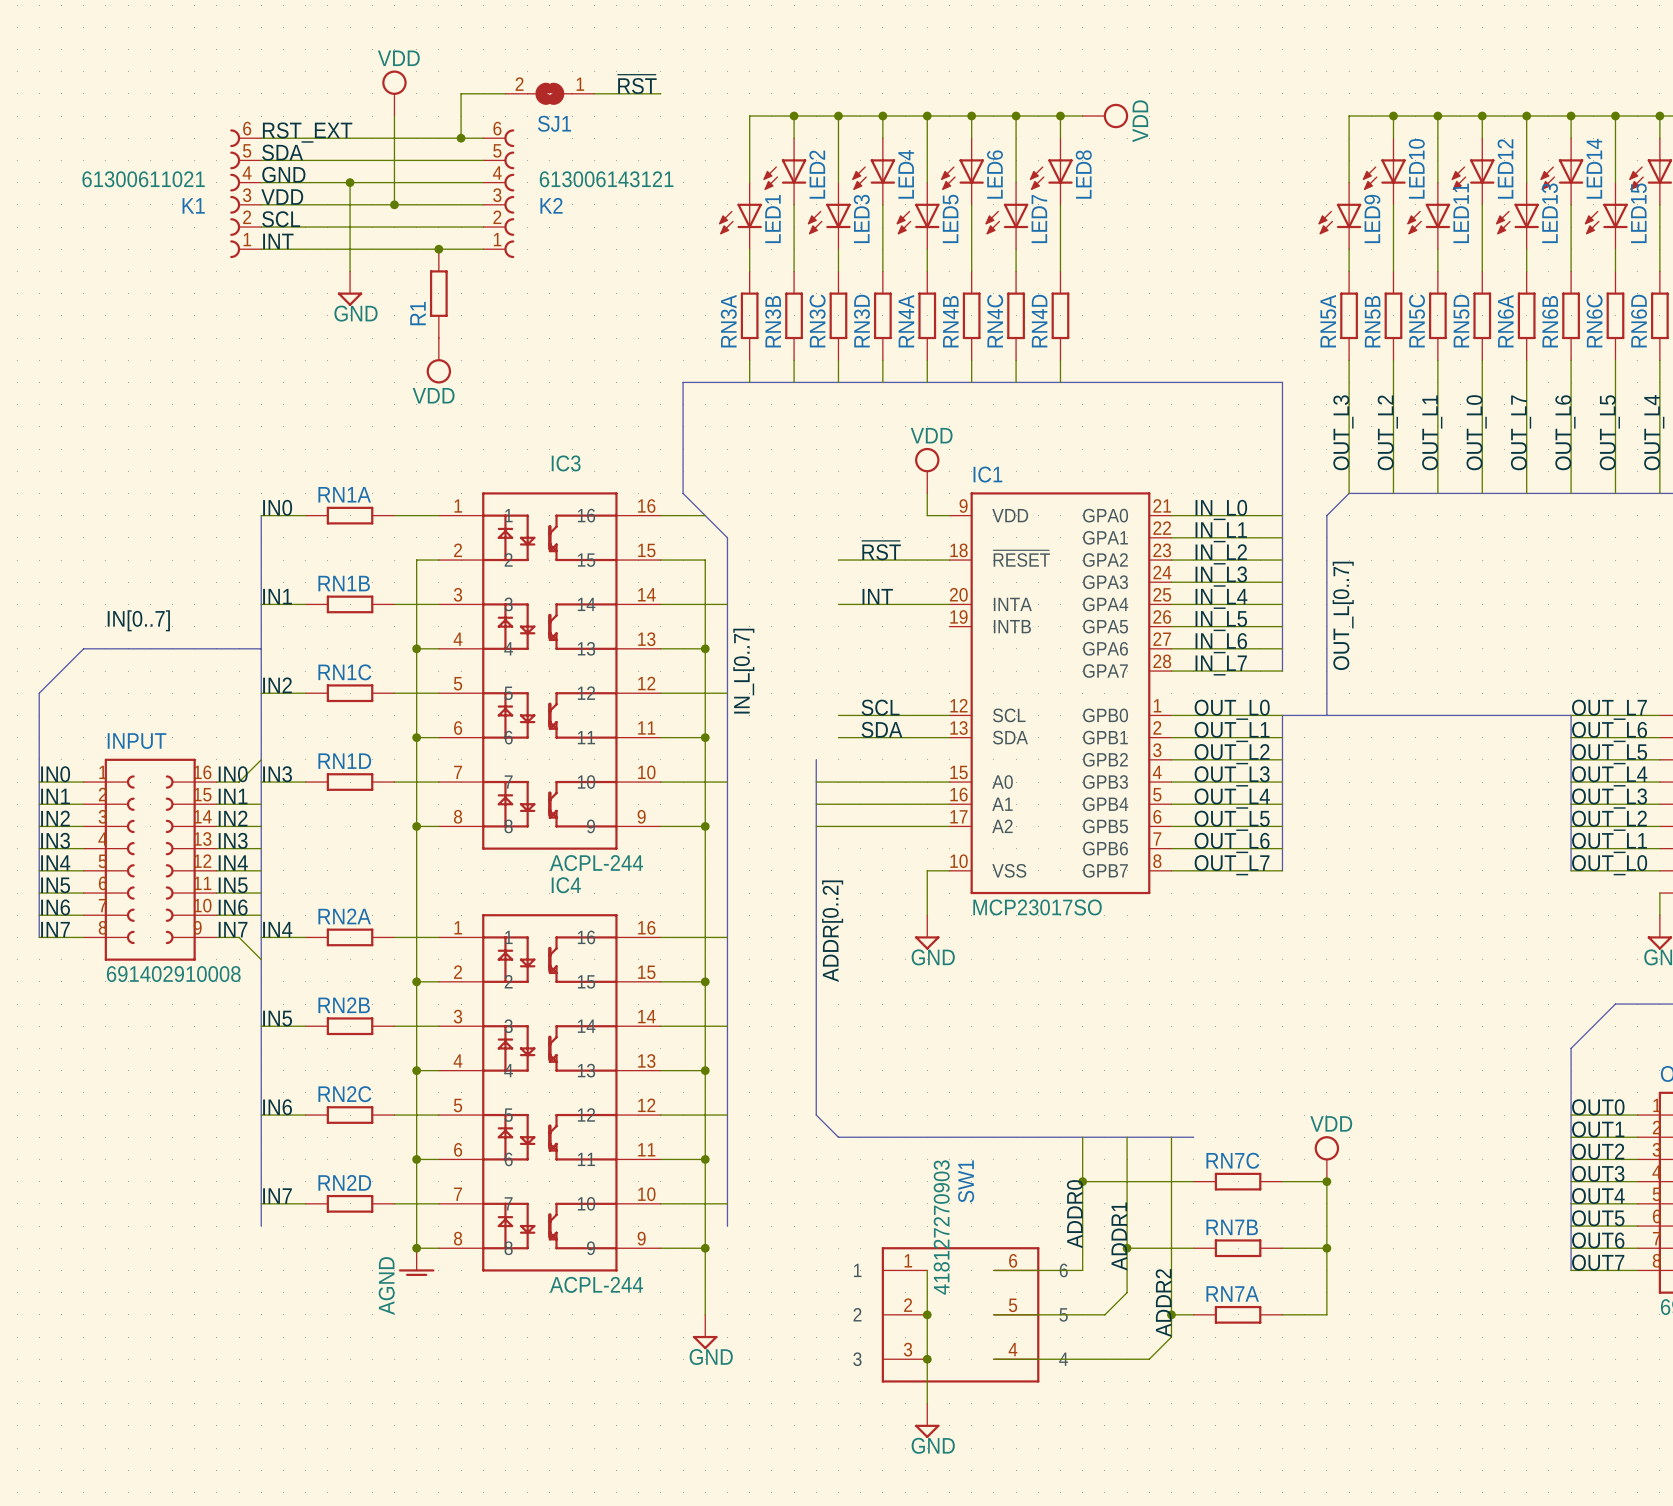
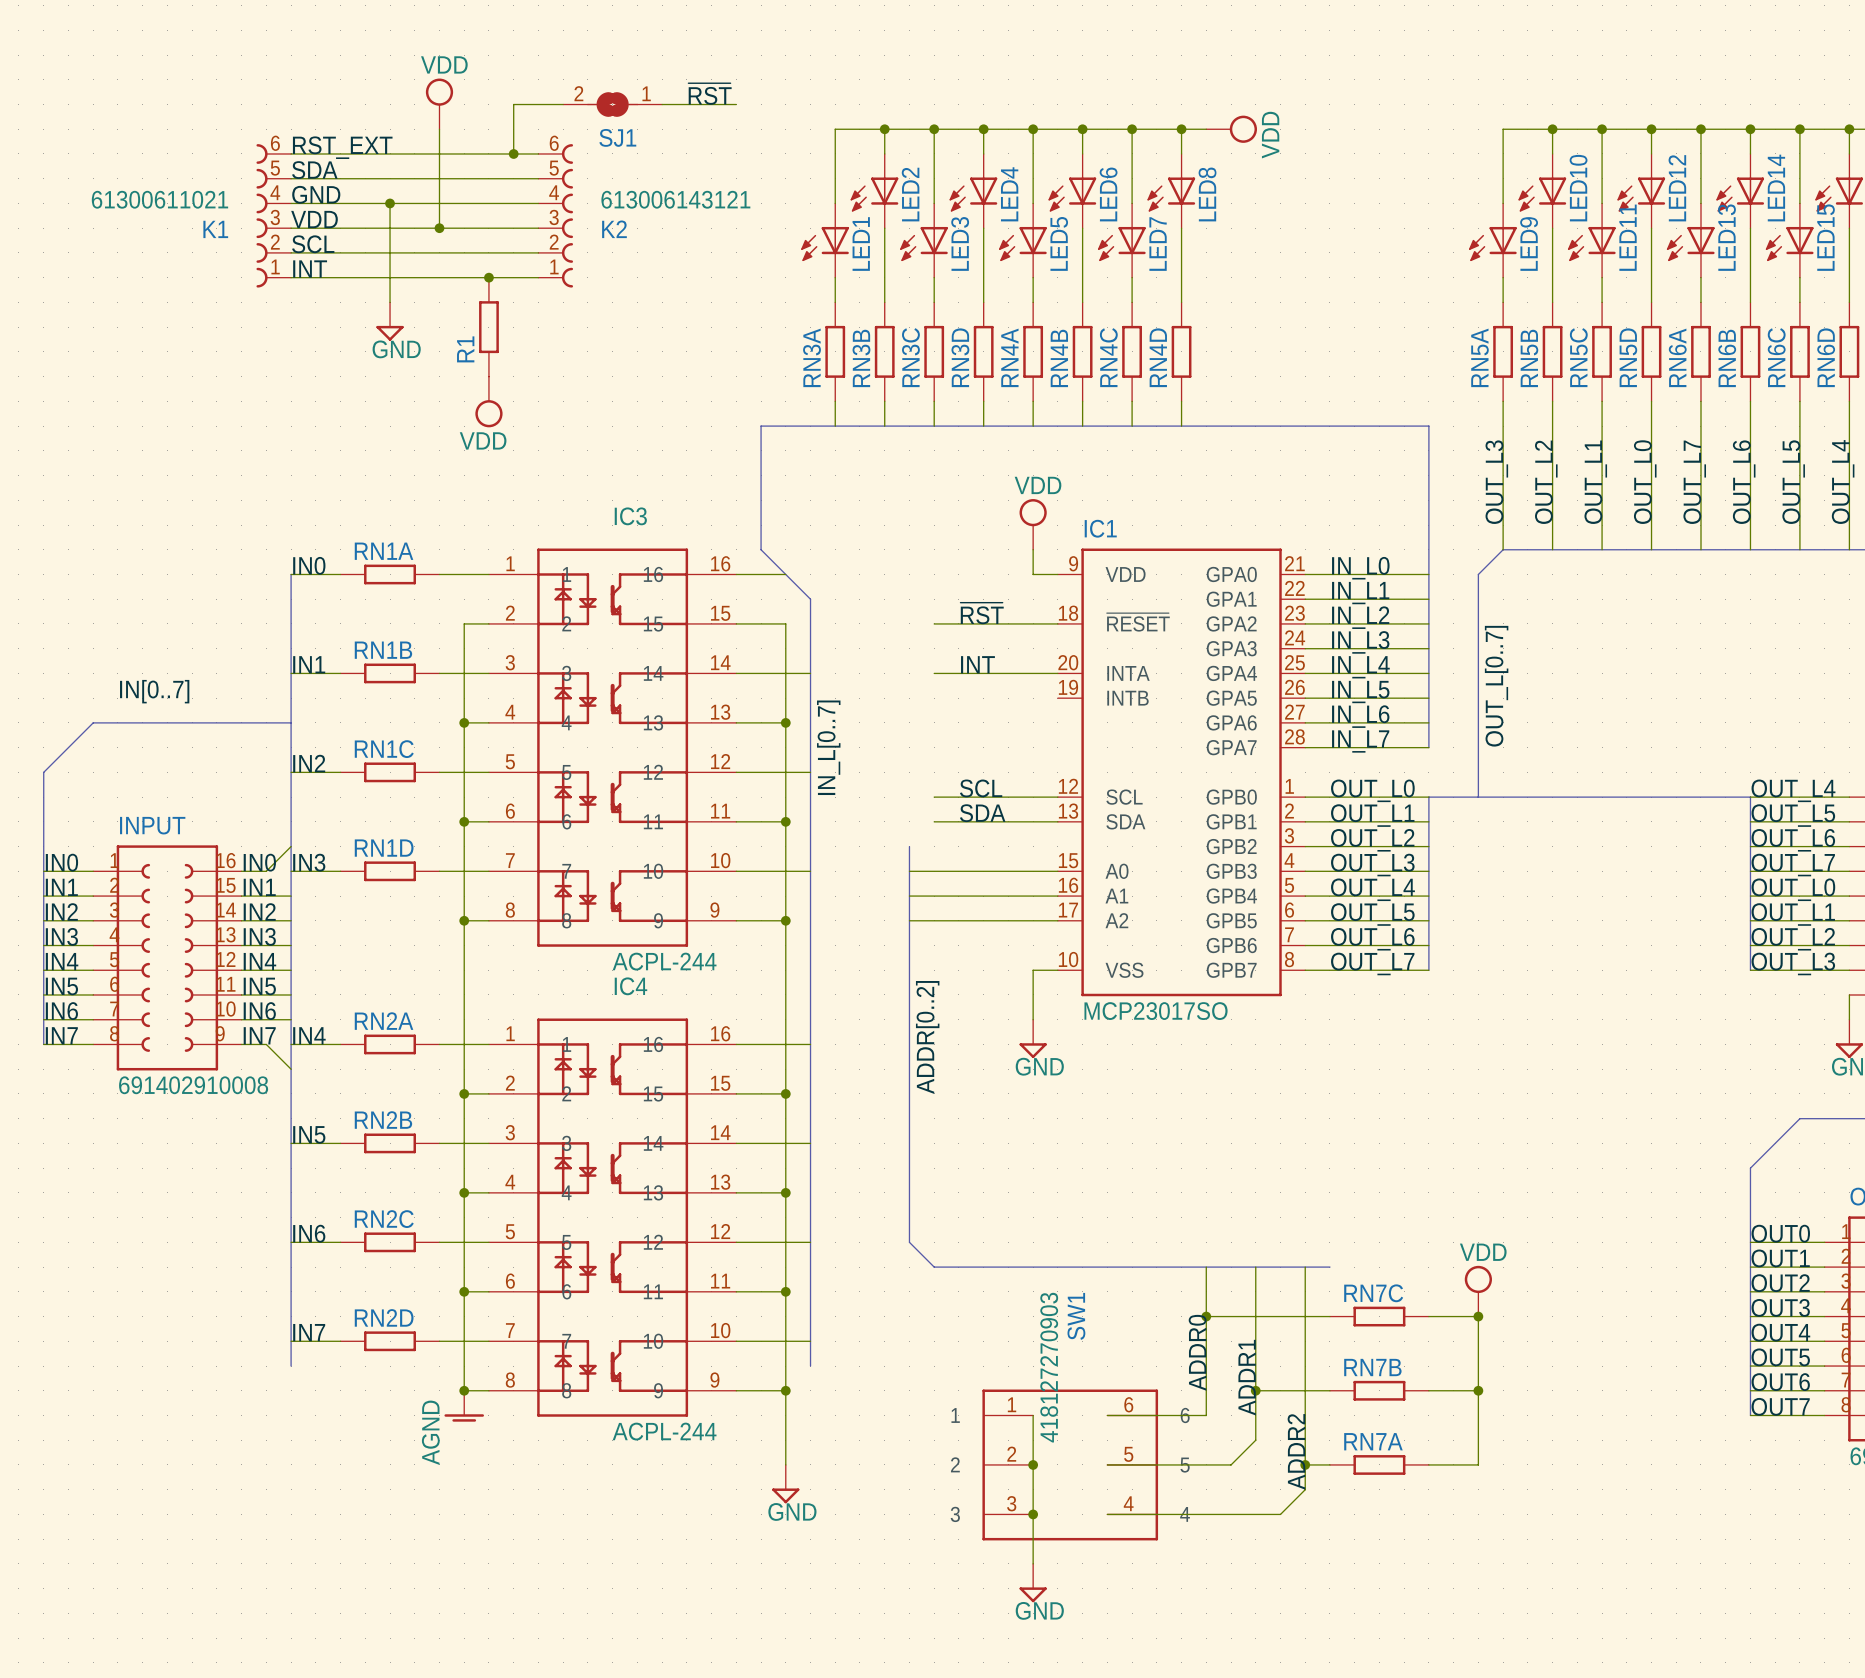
label: OUT_L7 (1609, 709) -> OUT_L4 (1793, 790)
label: OUT_L6 (1609, 731) -> OUT_L5 (1793, 815)
label: OUT_L5 (1609, 754) -> OUT_L6 (1793, 840)
label: OUT_L4 (1609, 776) -> OUT_L7 (1793, 865)
label: OUT_L3 (1609, 798) -> OUT_L0 (1793, 889)
label: OUT_L2 (1609, 820) -> OUT_L1 (1793, 914)
label: OUT_L1 (1609, 842) -> OUT_L2 (1793, 939)
label: OUT_L0 (1609, 865) -> OUT_L3 (1793, 963)

